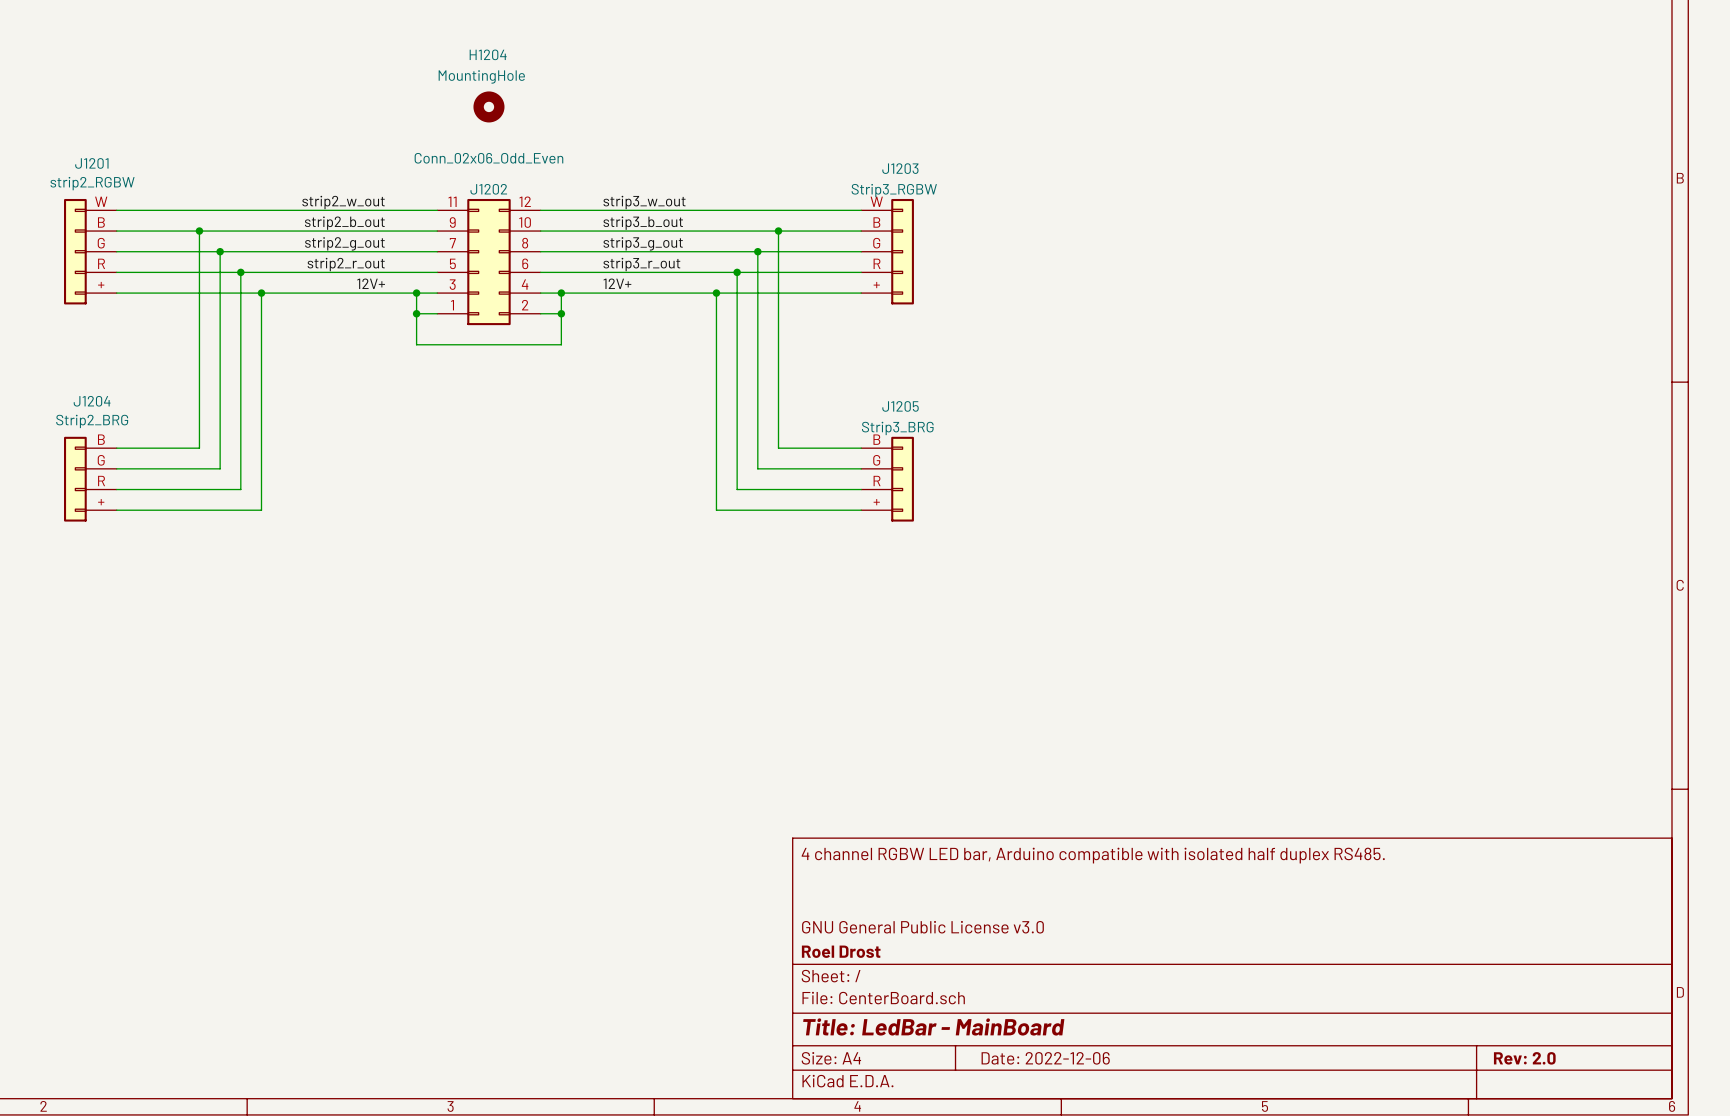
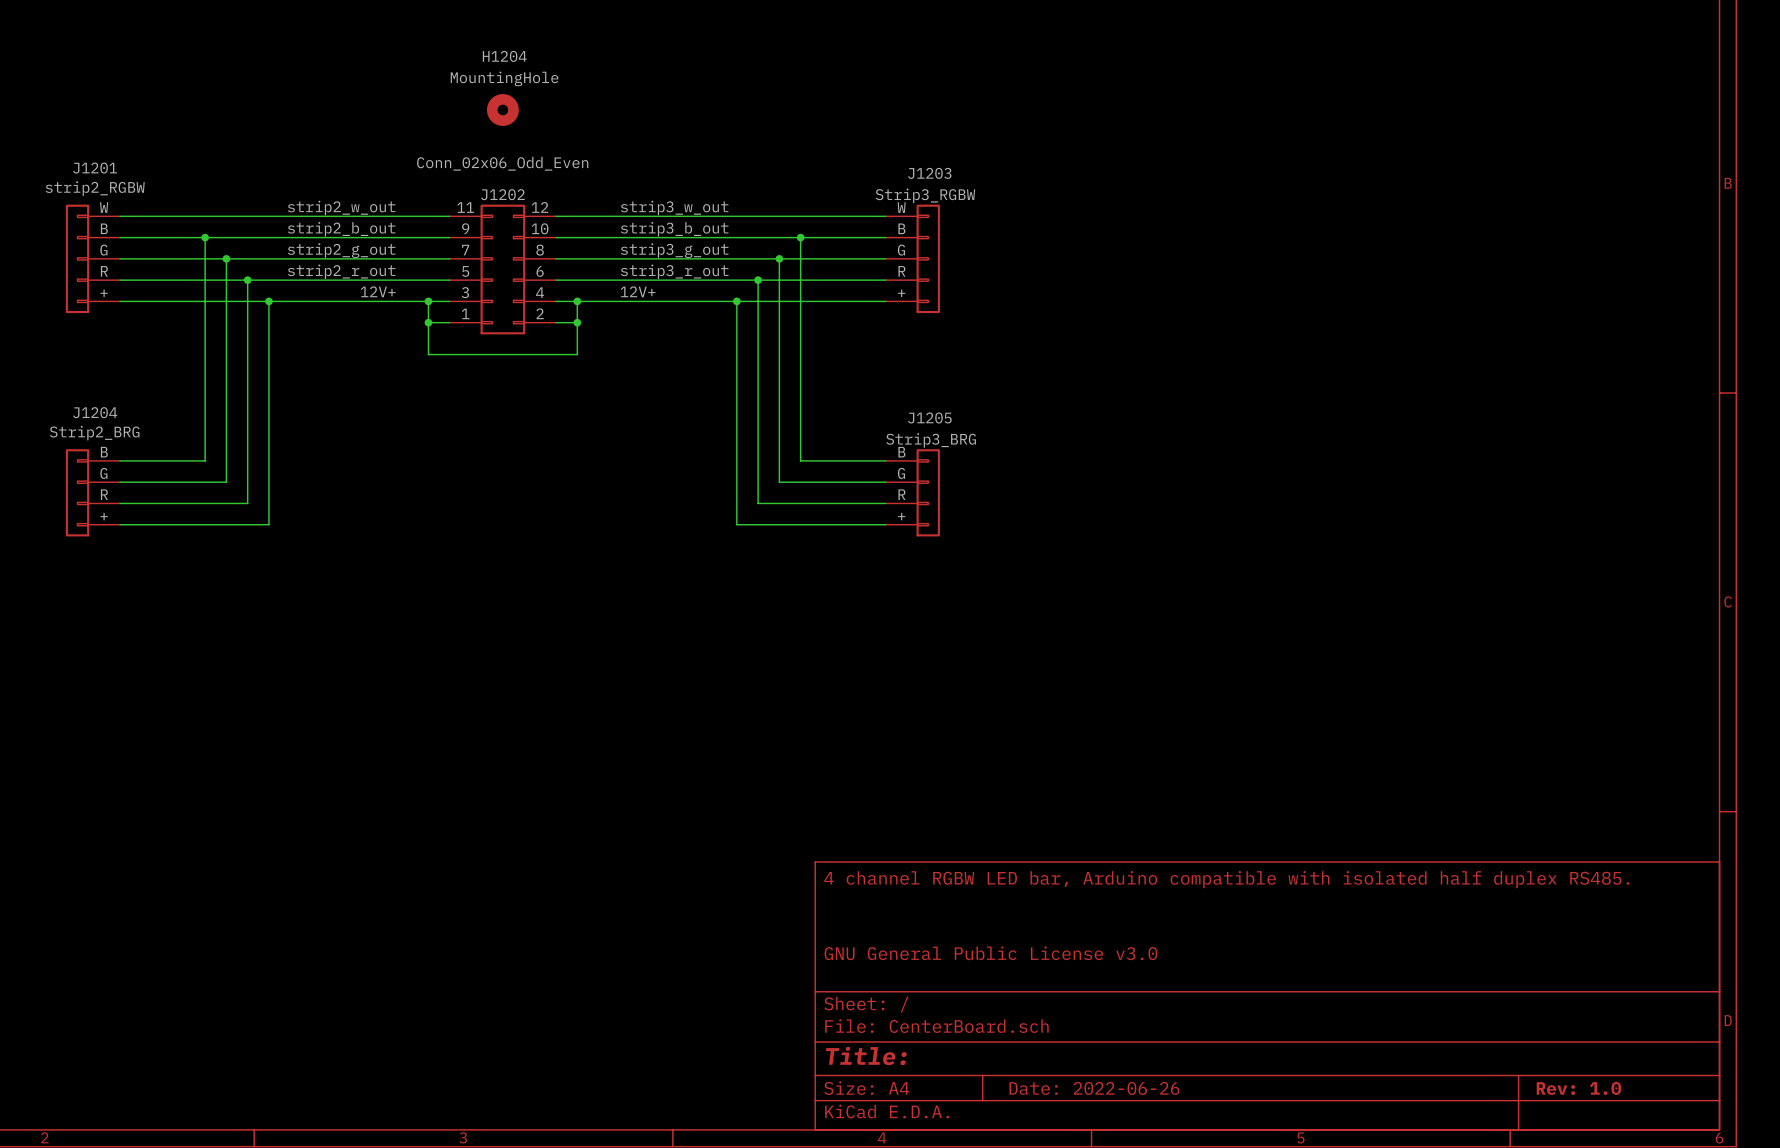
title block: Roel Drost (841, 951) -> none
title block: Title: LedBar - MainBoard (933, 1026) -> Title: (866, 1055)
title block: Date: 2022-12-06 (1045, 1058) -> Date: 2022-06-26 (1094, 1088)
title block: Rev: 2.0 (1524, 1058) -> Rev: 1.0 (1578, 1088)

